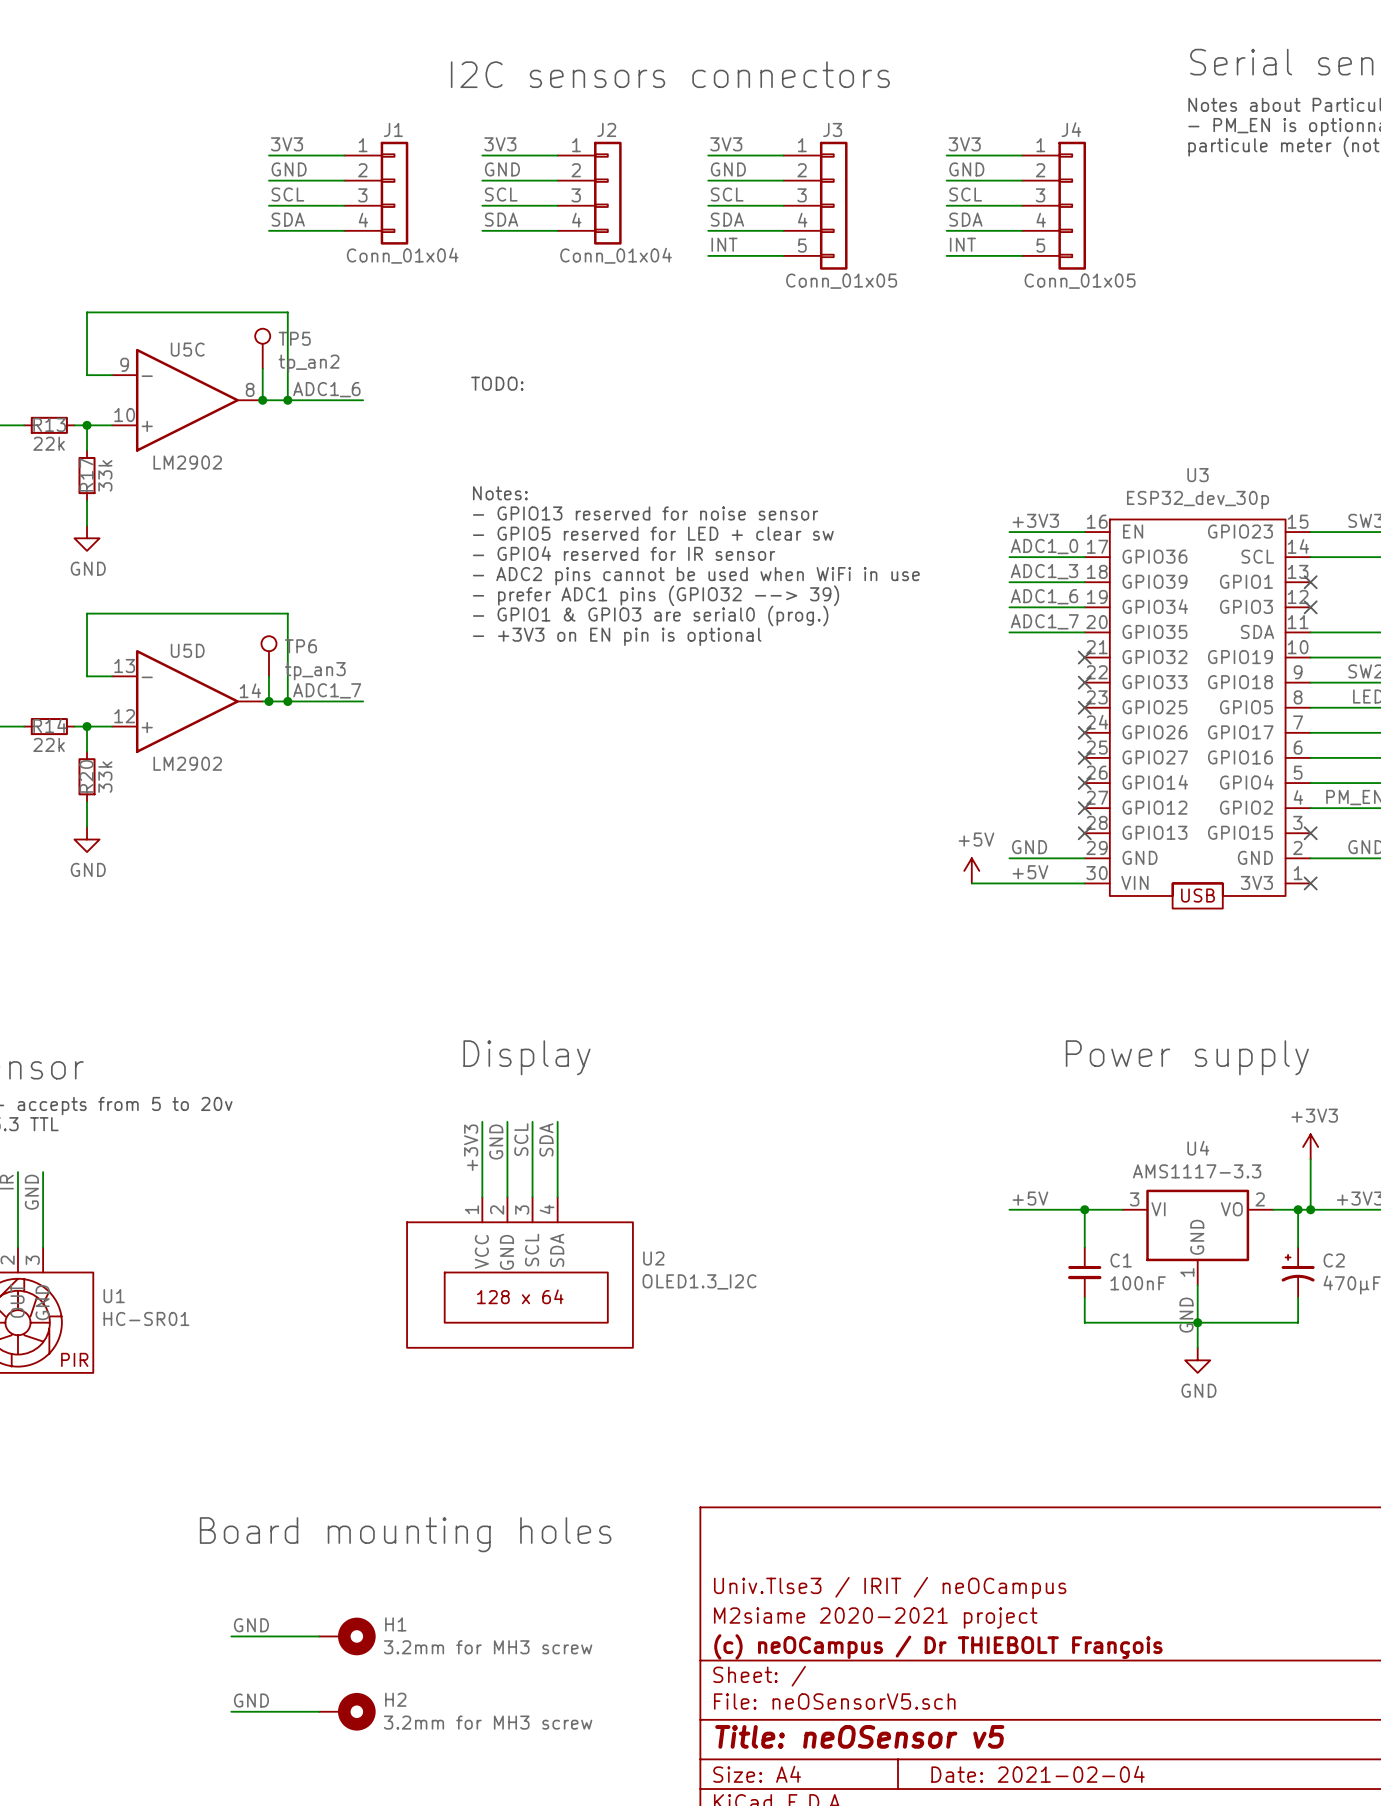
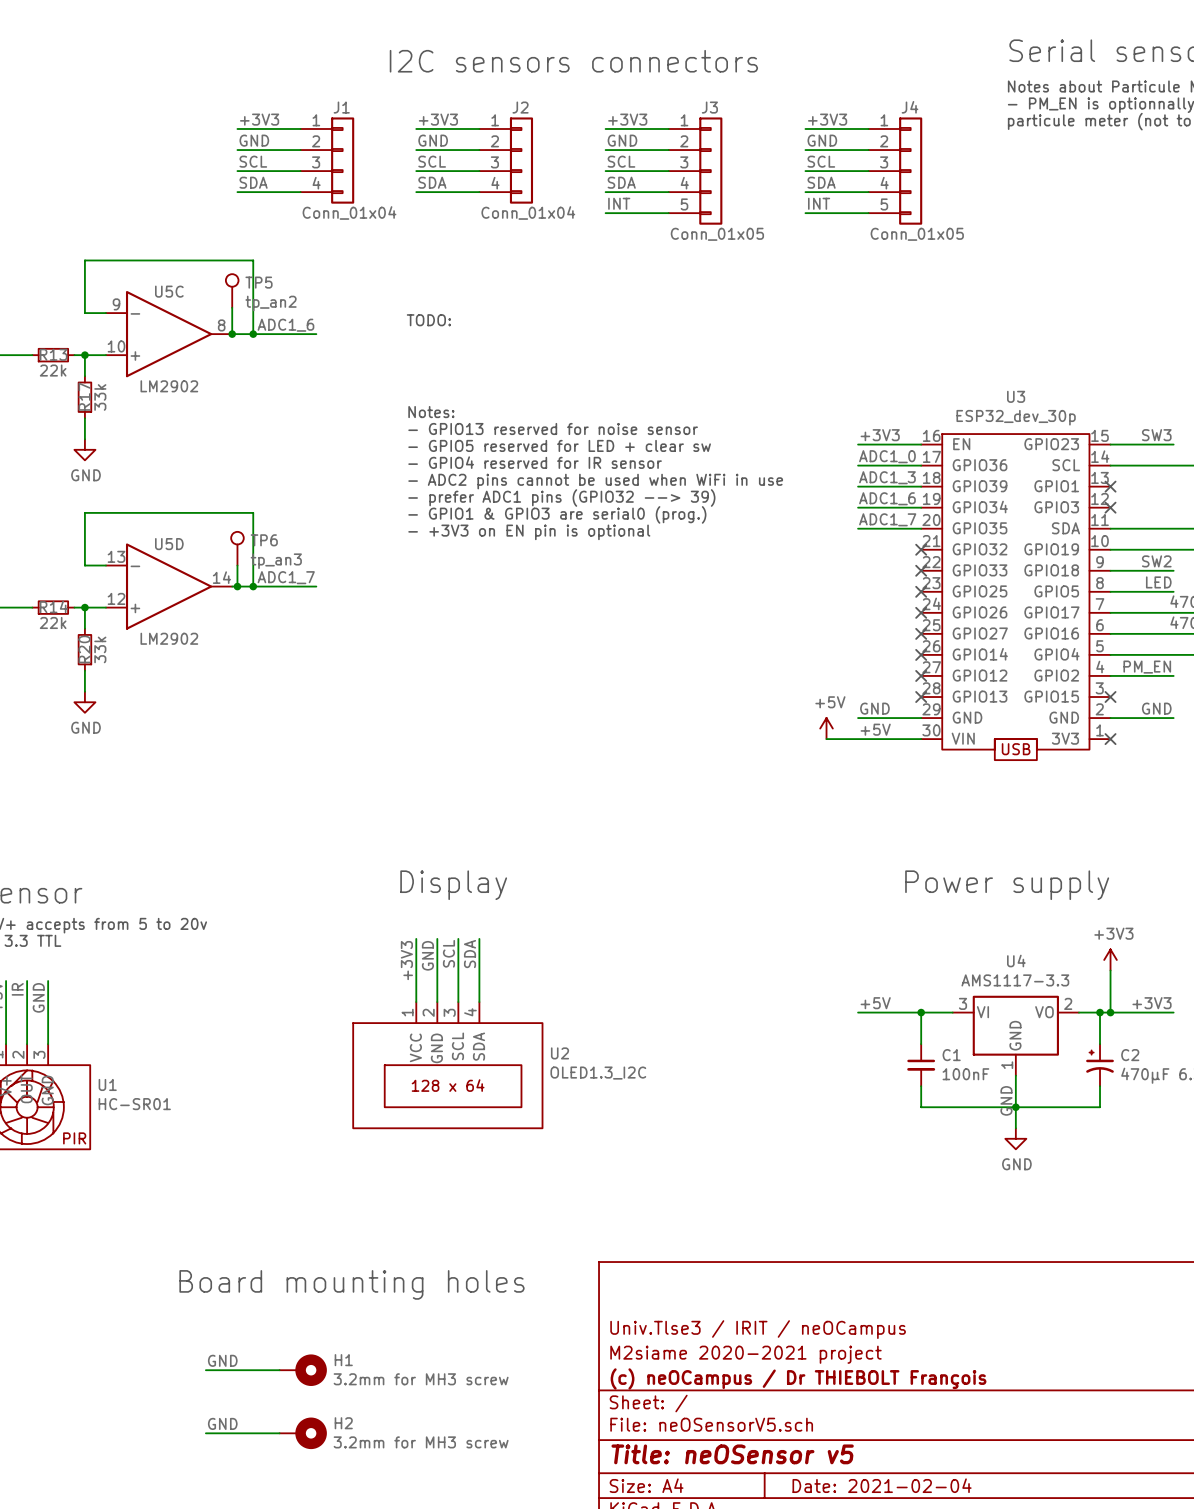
label: 3V3 (287, 144) -> +3V3 (259, 119)
label: 3V3 (500, 144) -> +3V3 (438, 119)
label: 3V3 (726, 144) -> +3V3 (627, 119)
label: 3V3 (964, 144) -> +3V3 (827, 119)

